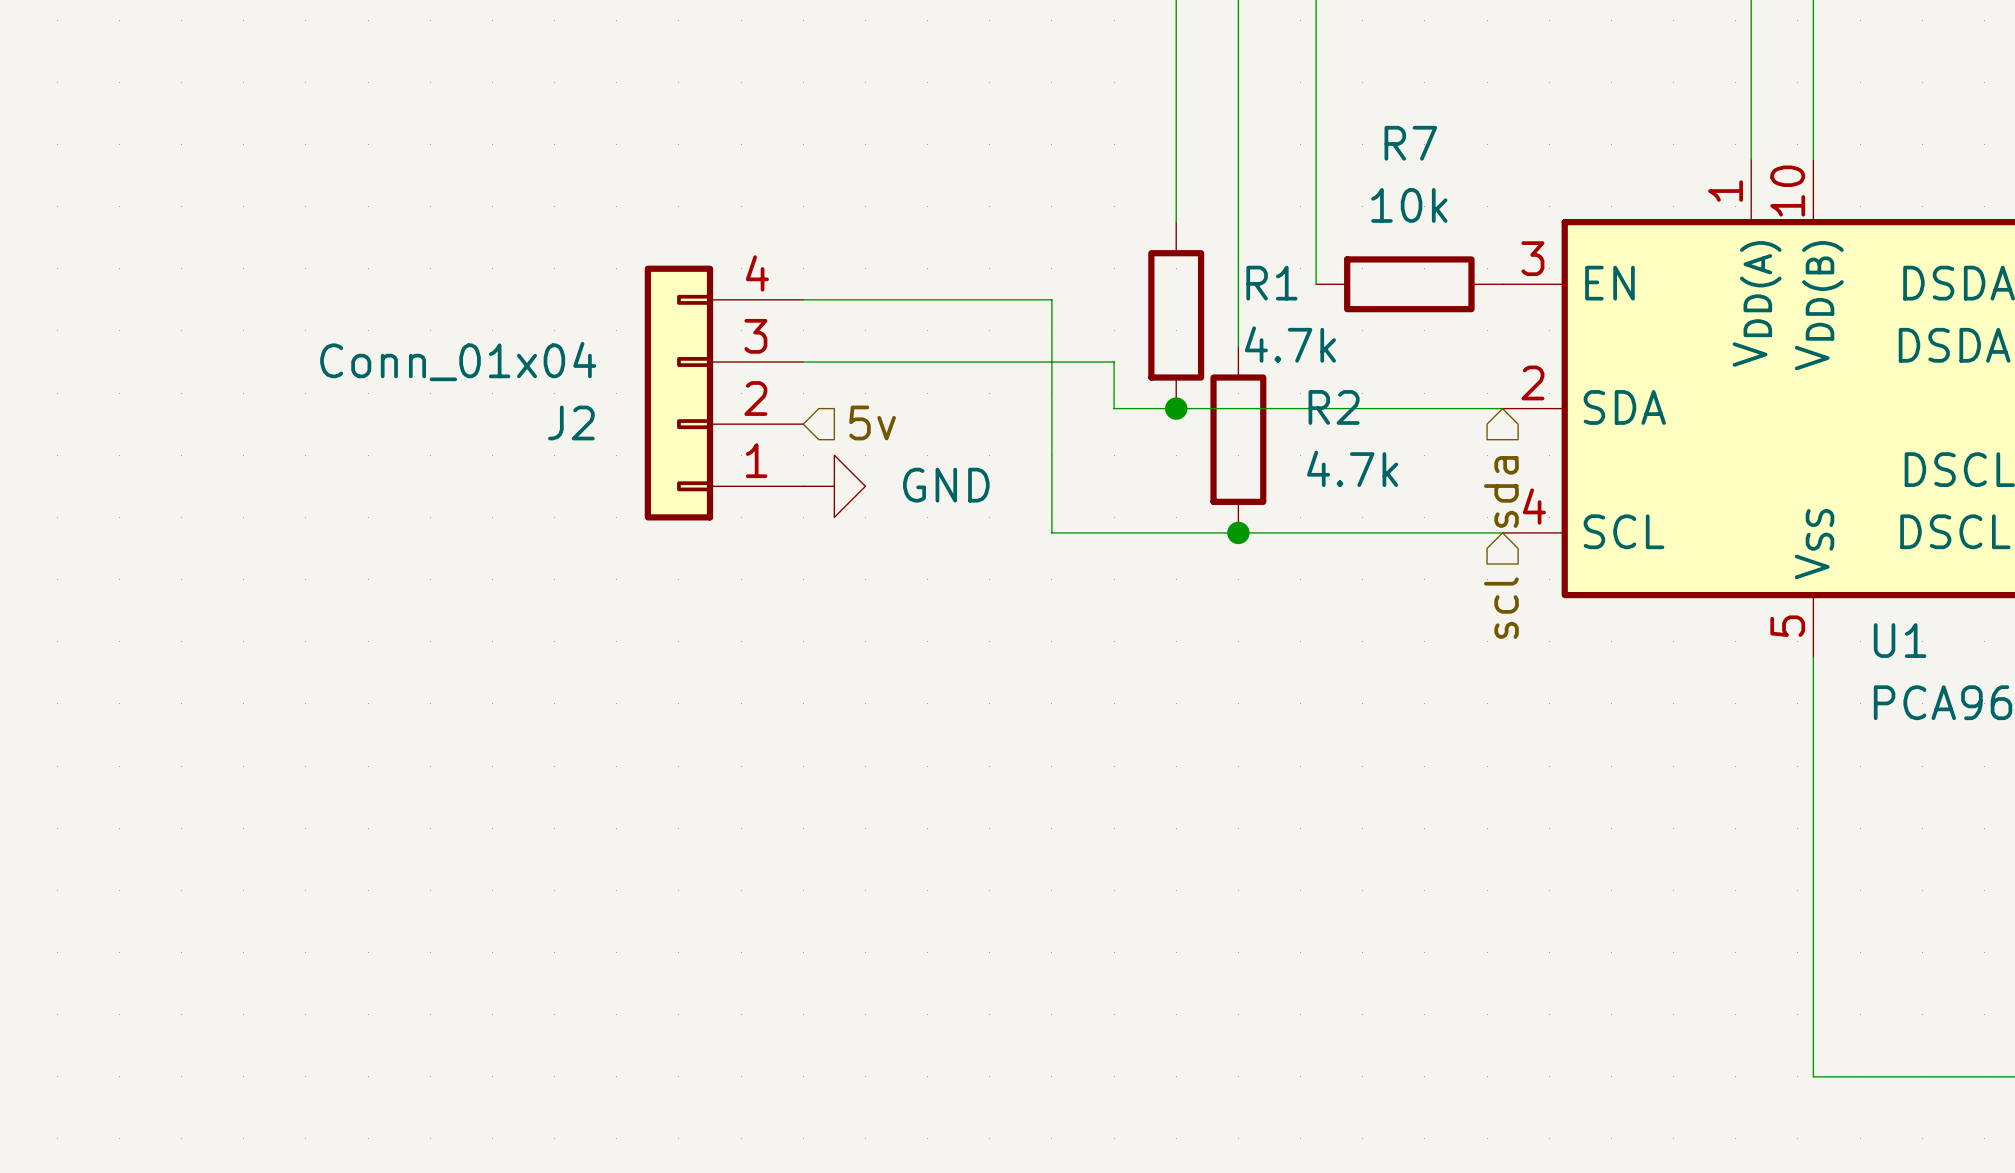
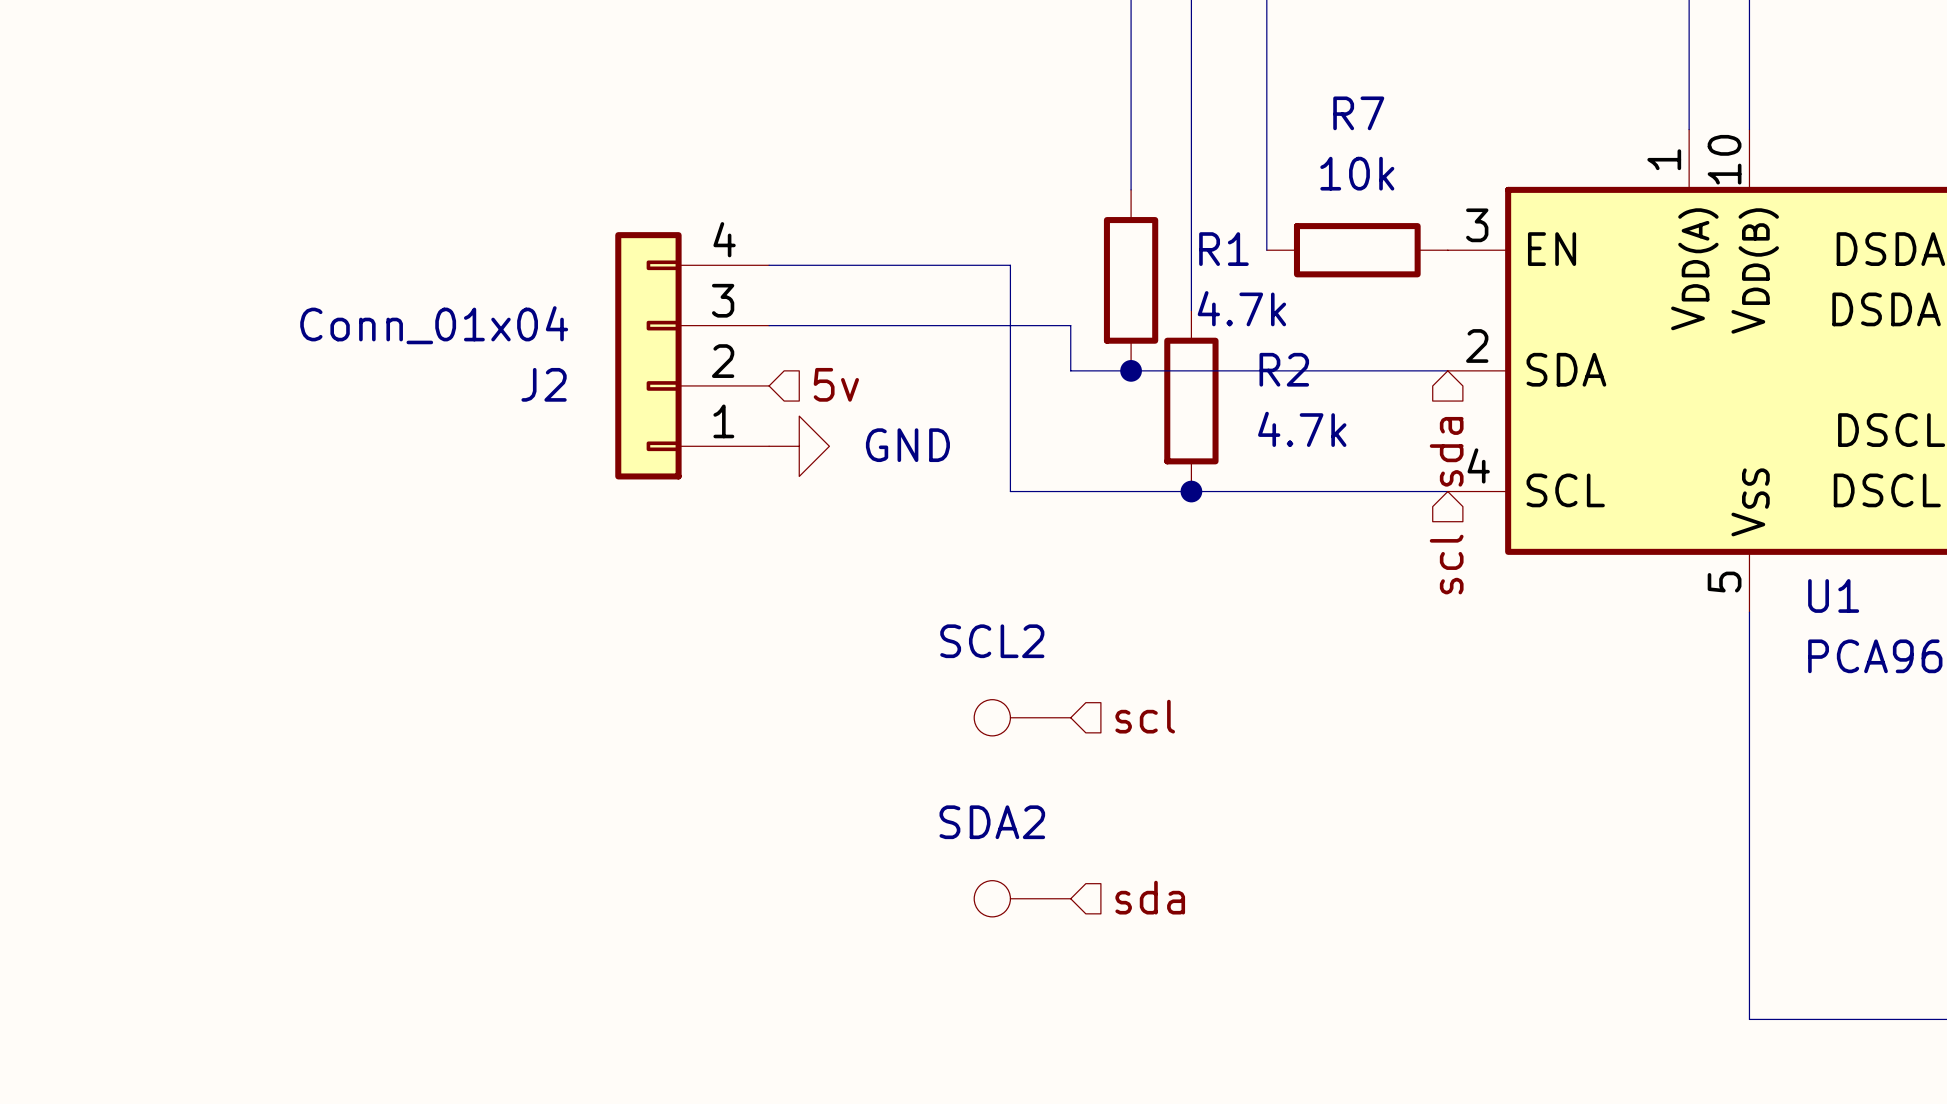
hierarchical label: none -> scl (1145, 716)
SCL2: none -> (1022, 717)
hierarchical label: none -> sda (1150, 897)
SDA2: none -> (1022, 898)

